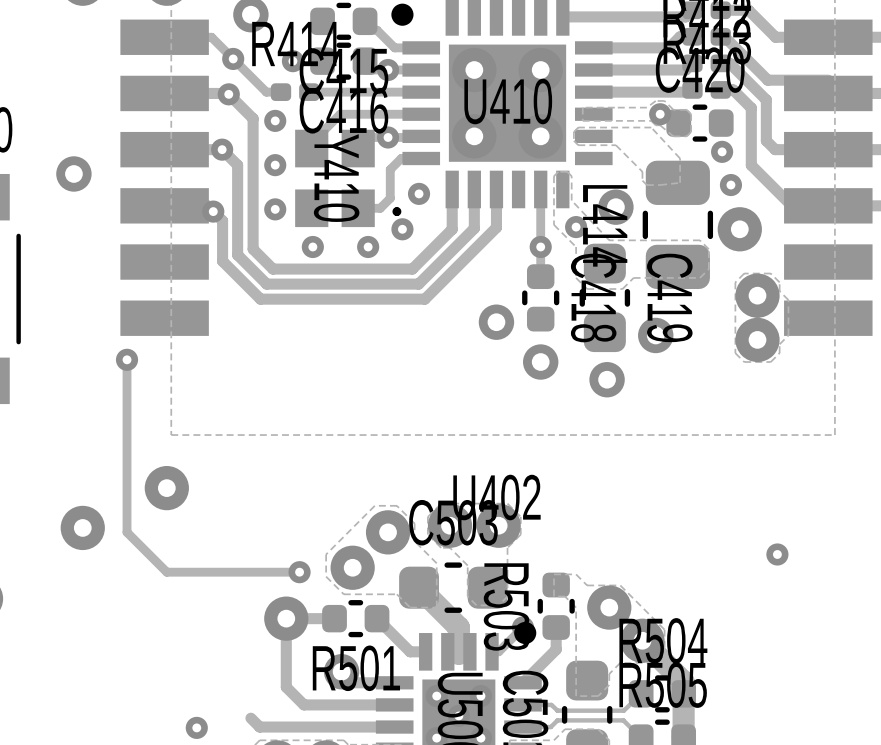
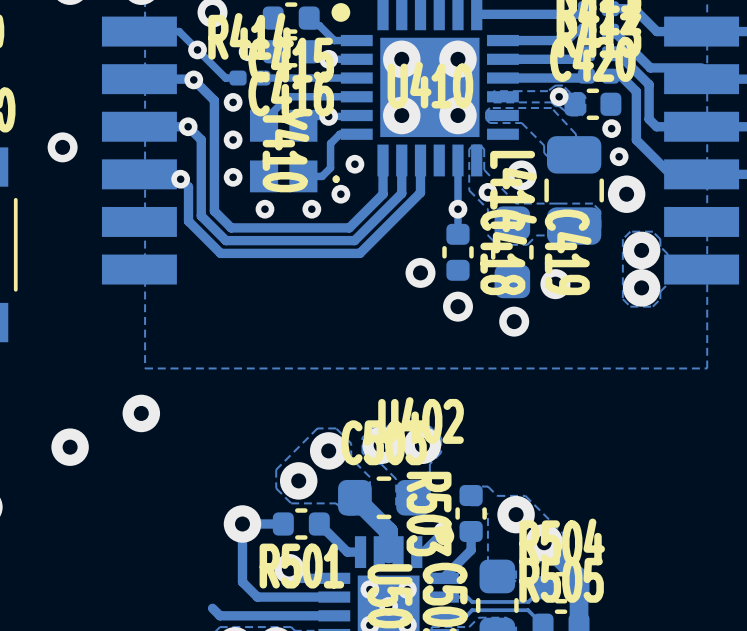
track: (127, 359) (127, 532) (166, 572) (299, 572) -> none
via: (127, 359) -> none
via: (777, 554) -> none
via: (299, 572) -> none
via: (196, 727) -> none

